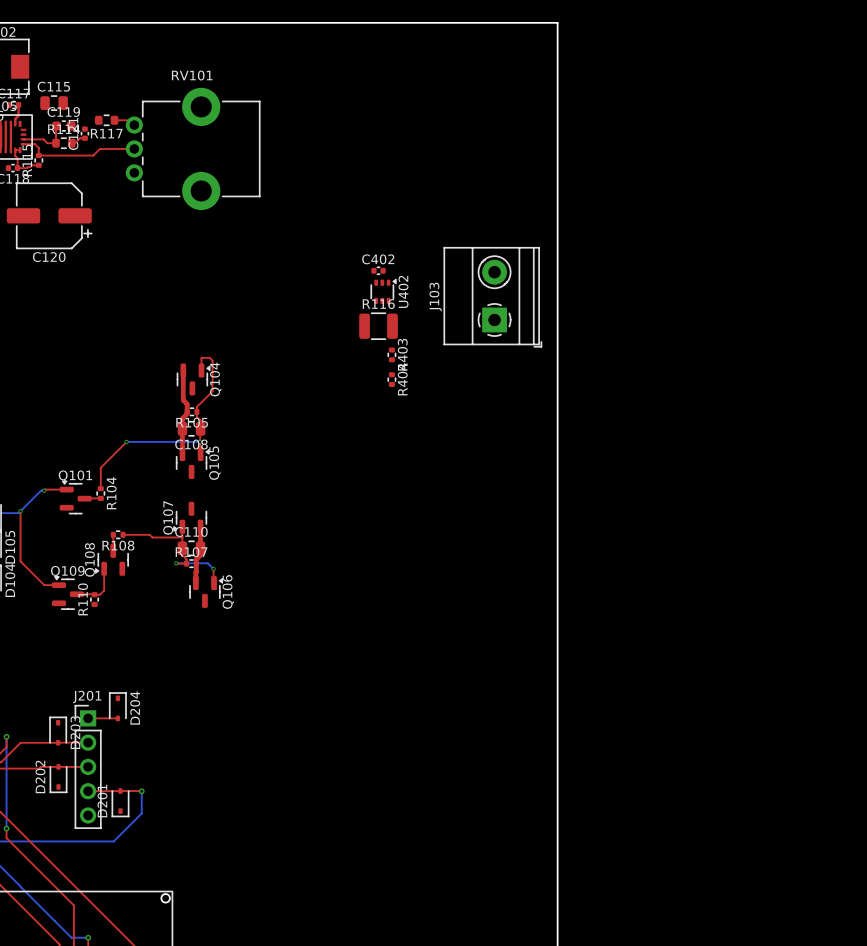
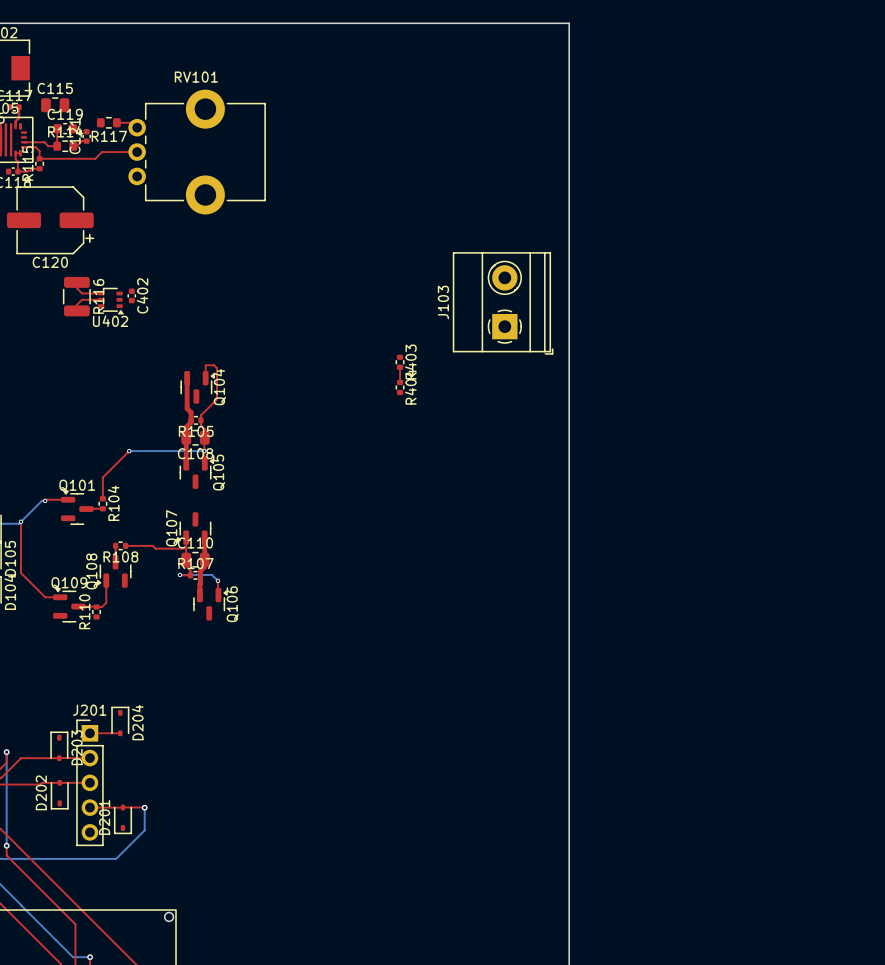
C402 rotation: 0° (378, 270) -> 90° clockwise (131, 295)
C402 position: (378, 270) -> (131, 295)
top track: none -> (76, 282) (76, 288) (82, 293) (101, 293)
U402 rotation: 0° (383, 291) -> 90° clockwise (110, 301)
U402 position: (383, 291) -> (110, 301)
top track: none -> (101, 299) (81, 299) (76, 304) (76, 310)
R116 rotation: 0° (378, 326) -> 90° clockwise (76, 296)
R116 position: (378, 326) -> (76, 296)
top track: none -> (400, 367) (400, 382)

